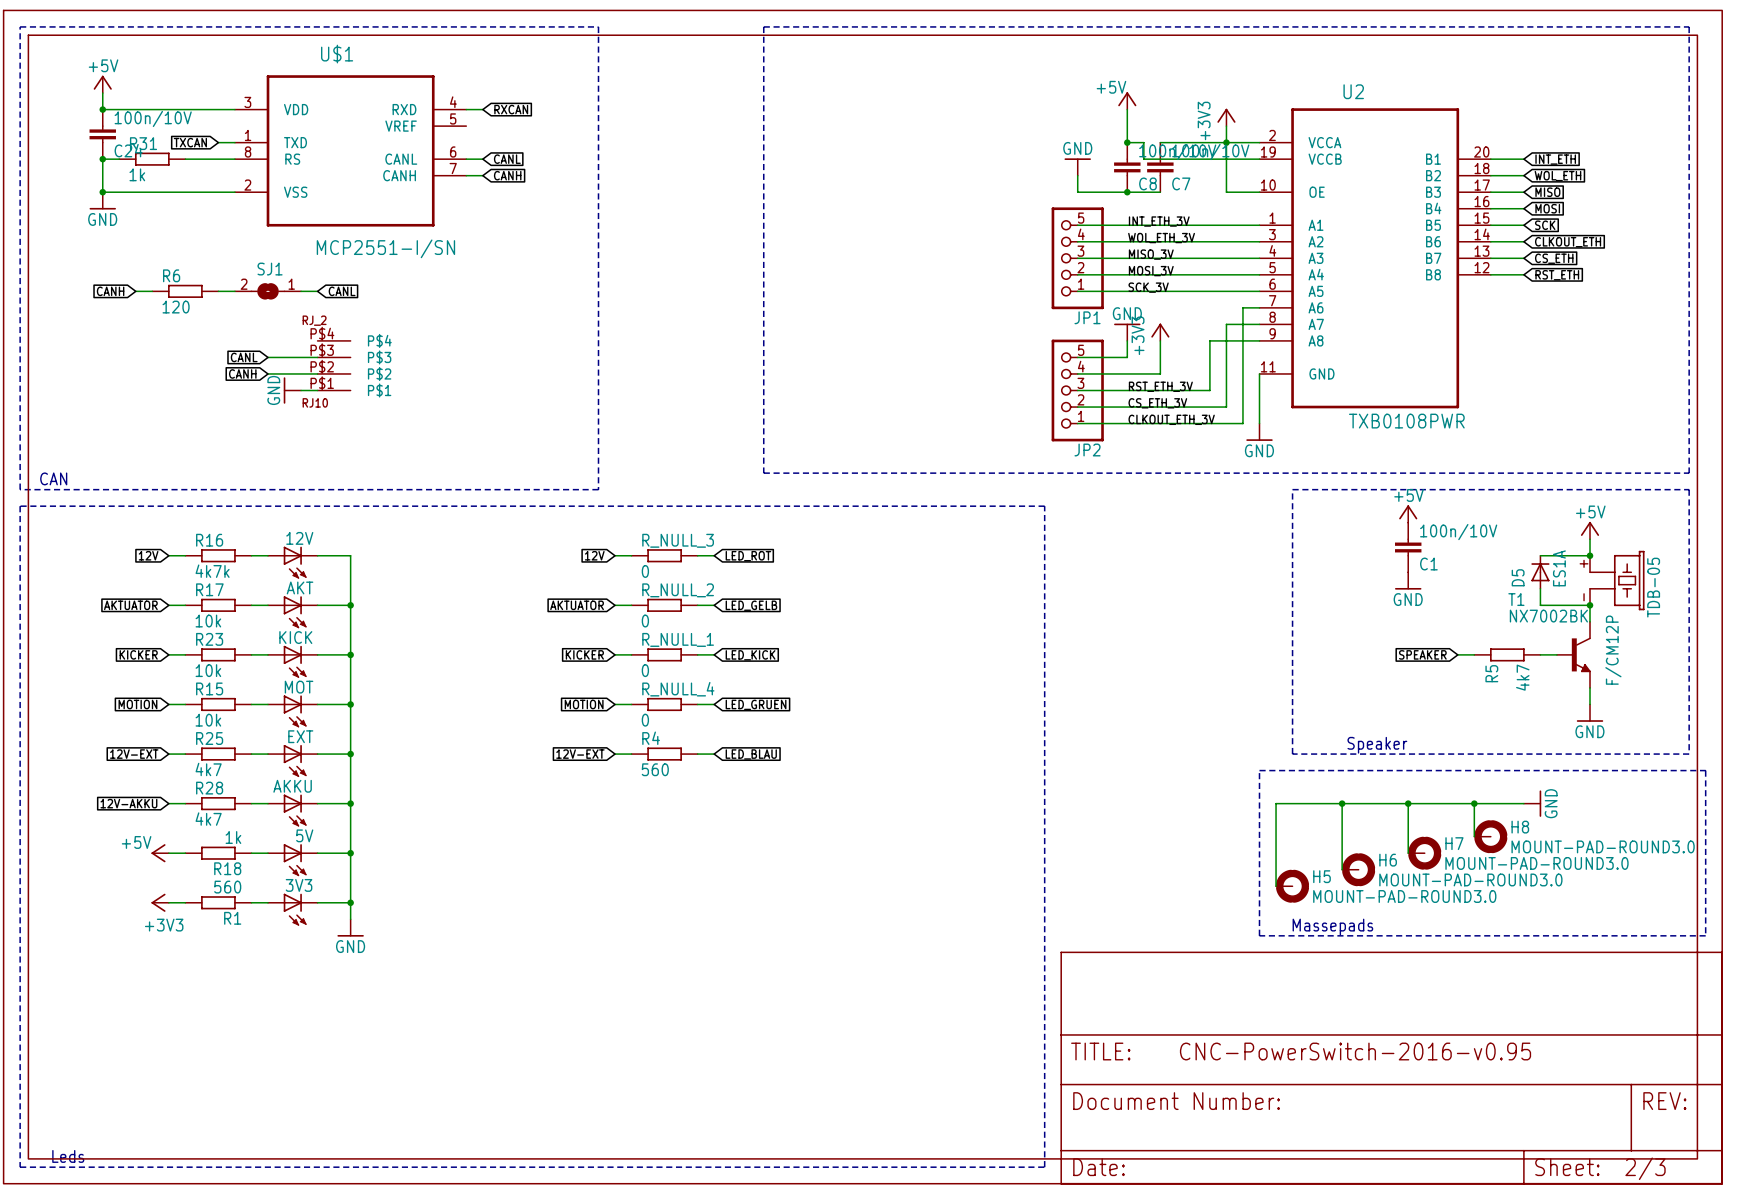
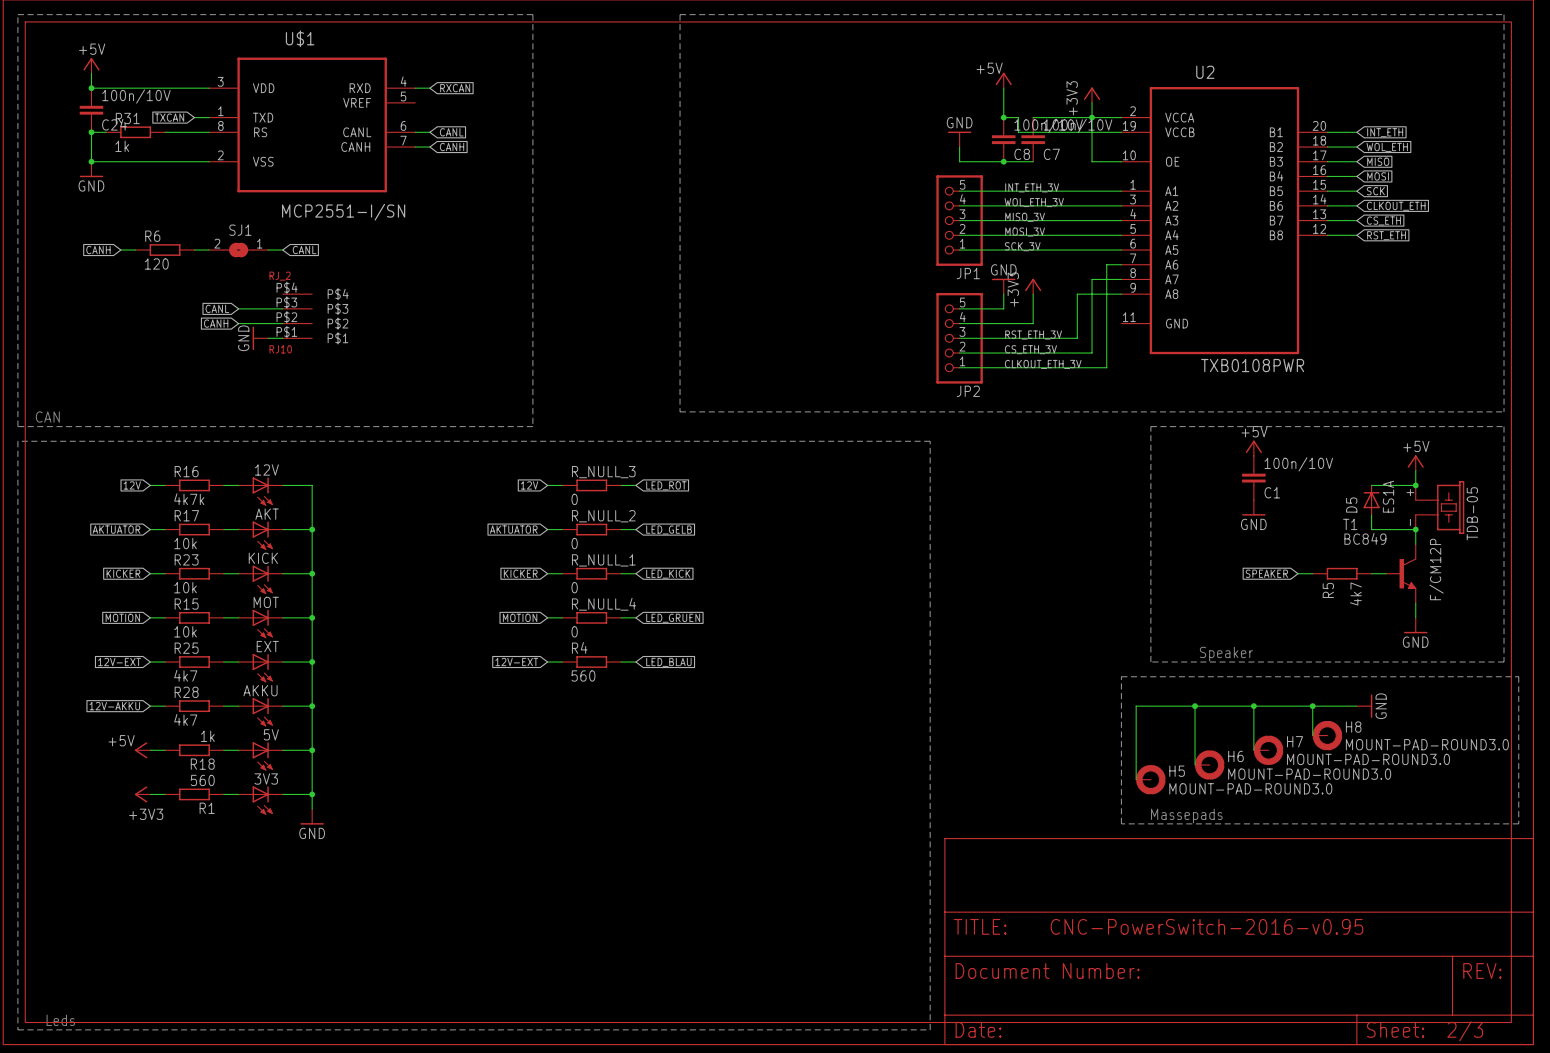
wire: (1259, 373) (1259, 423) -> none
power symbol: GND (1259, 432) -> none
T1 value: NX7002BK (1548, 616) -> BC849 (1365, 538)

